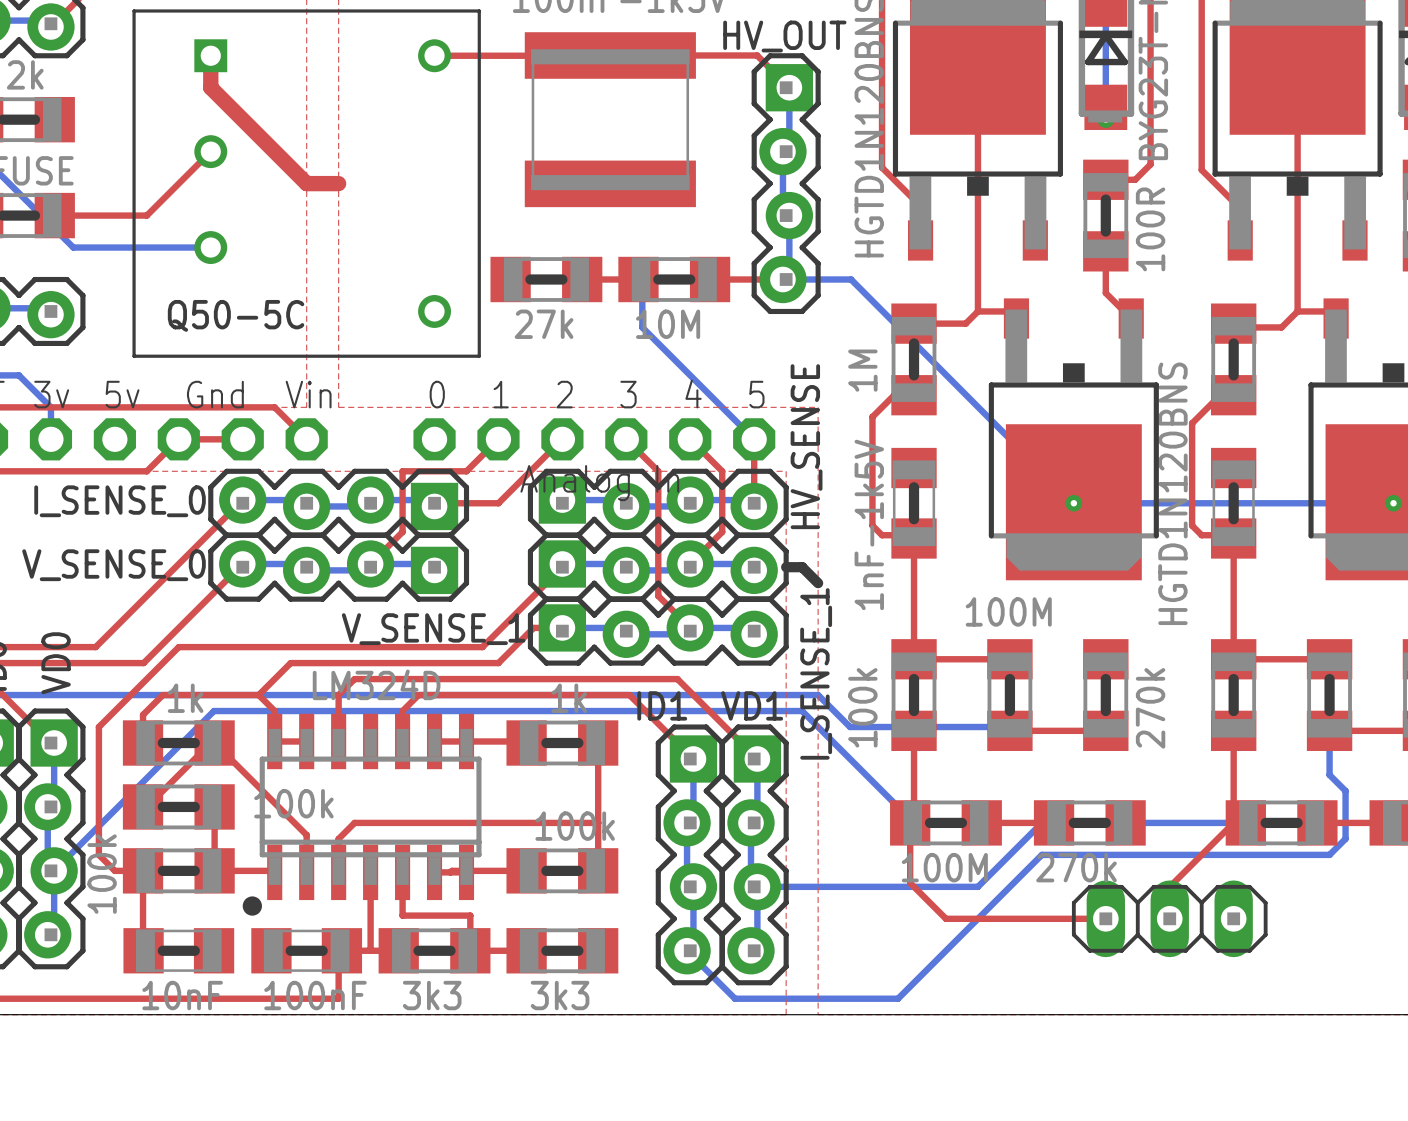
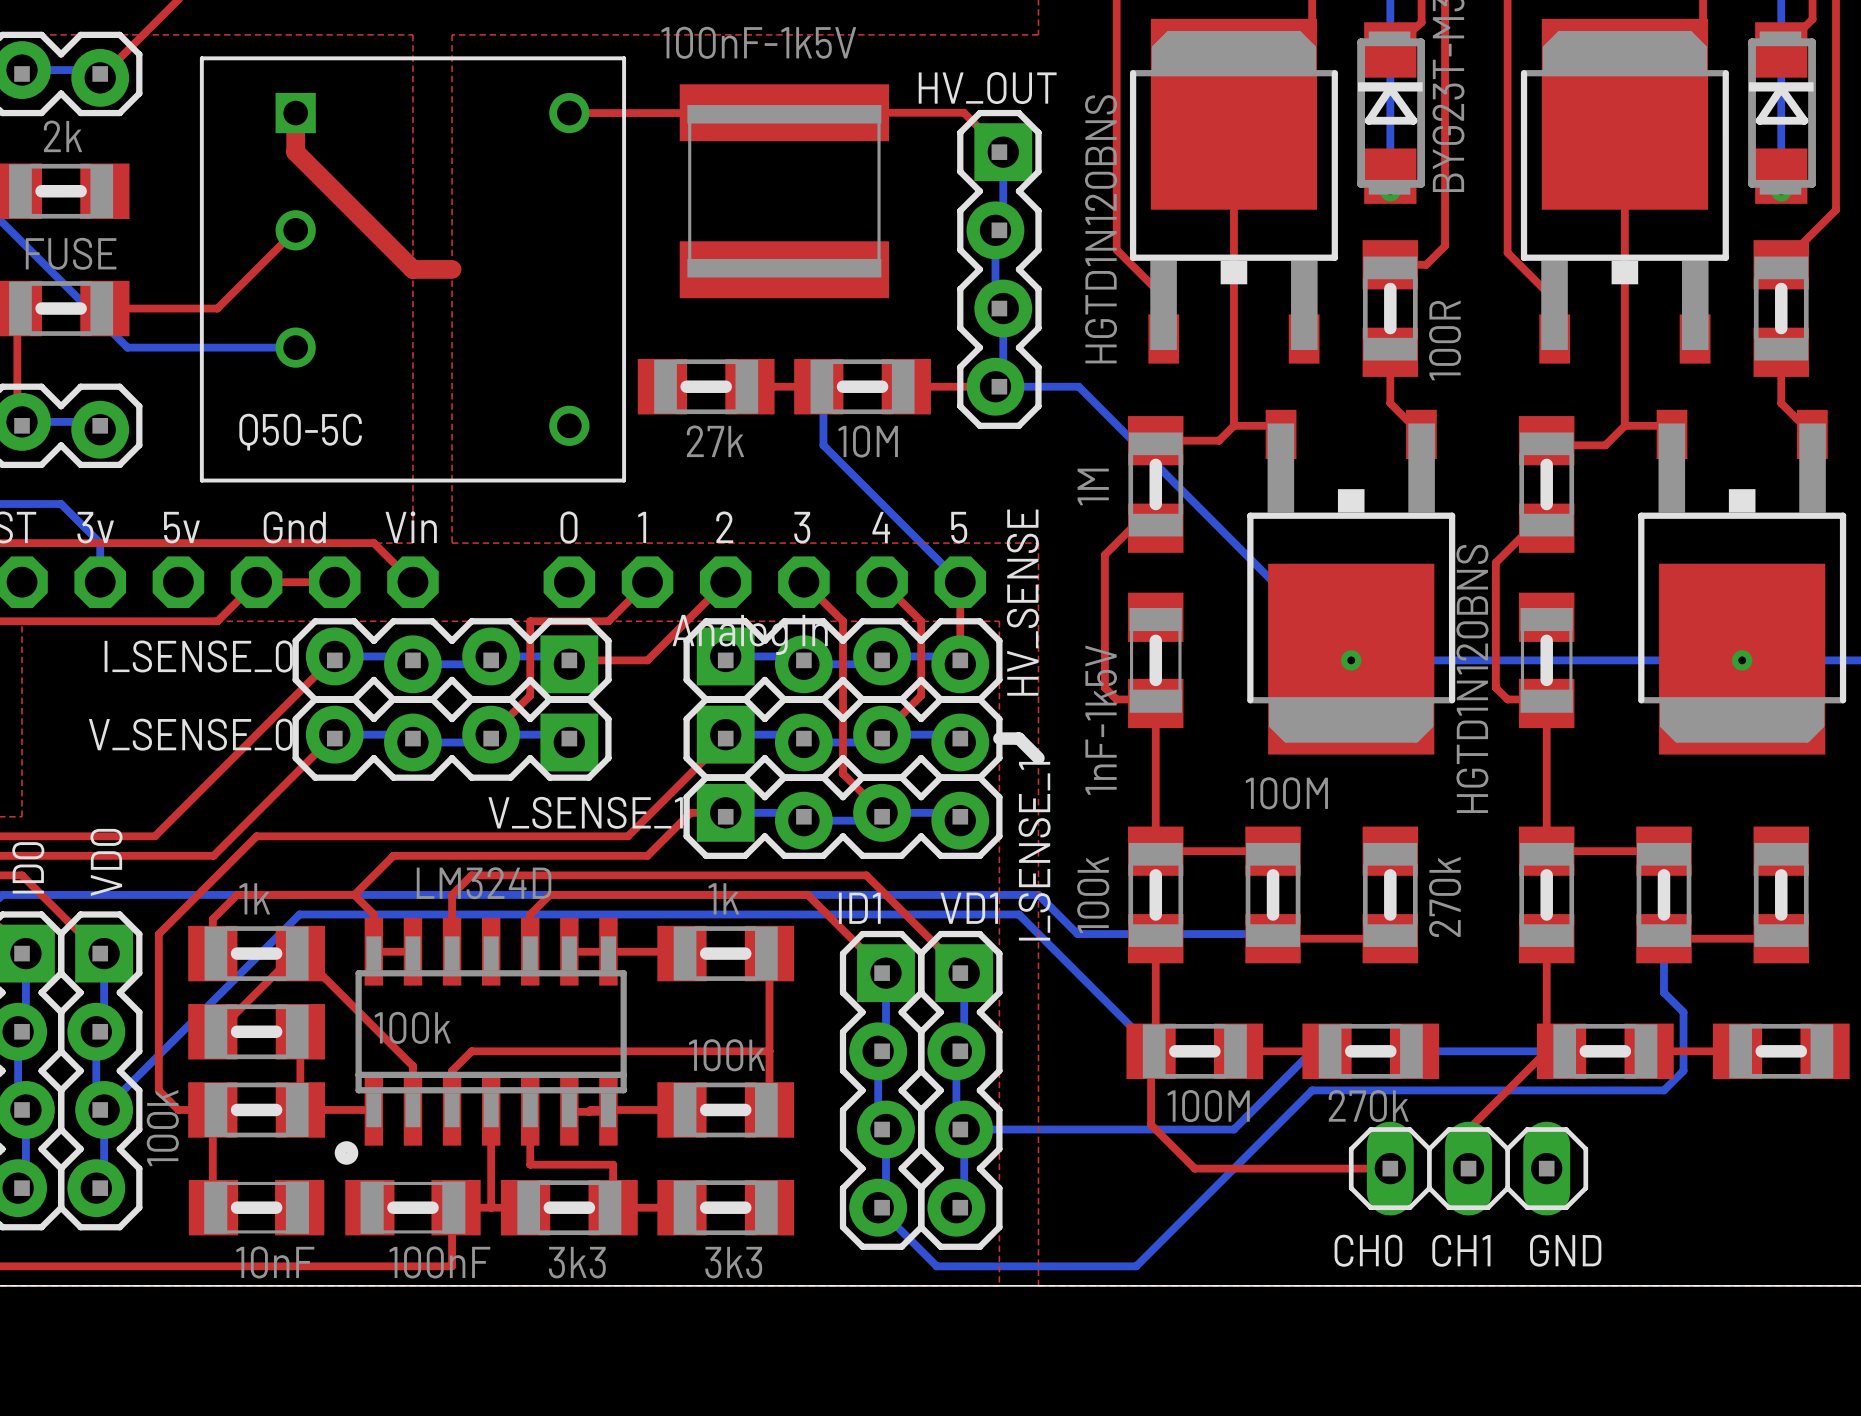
text: none -> CH0 (1368, 1250)
text: none -> CH1 (1461, 1250)
text: none -> GND (1565, 1250)

